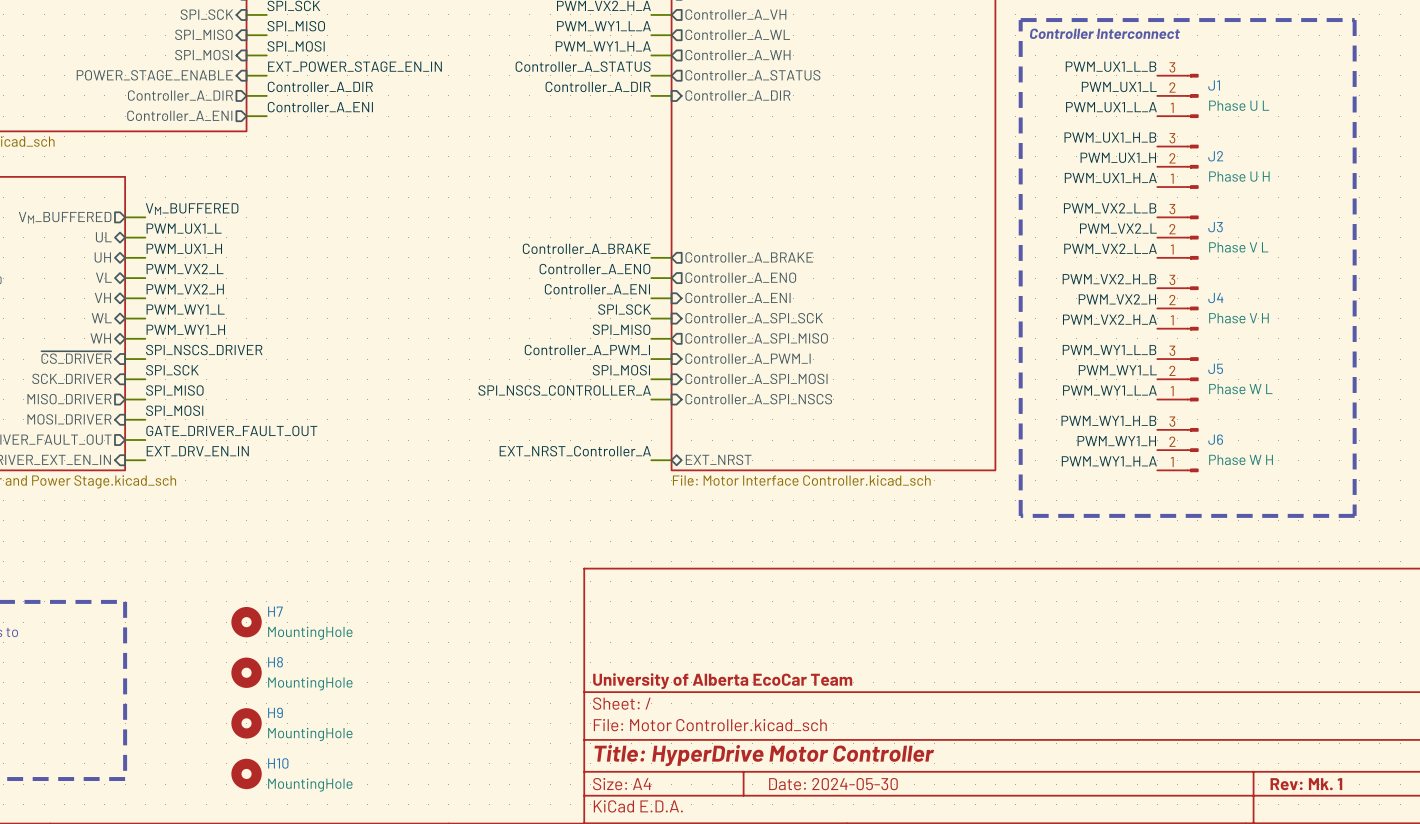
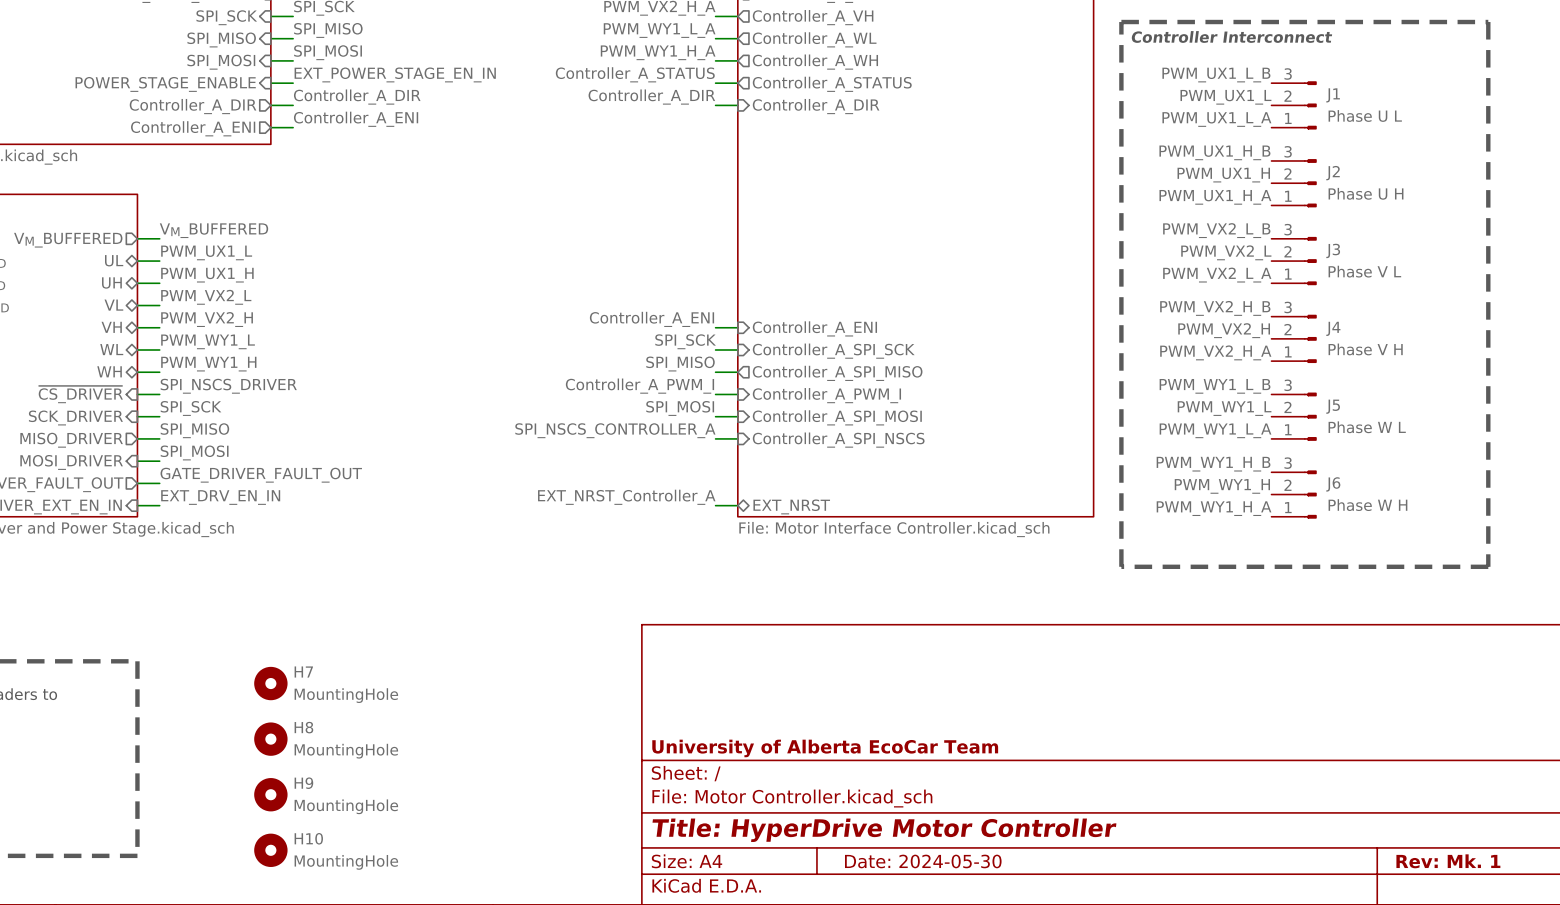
label: Controller_A_BRAKE (586, 248) -> none
wire: (651, 257) (671, 257) -> none
sheet pin: Controller_A_BRAKE (749, 257) -> none
label: Controller_A_ENO (594, 269) -> none
sheet pin: Controller_A_ENO (740, 277) -> none
wire: (651, 278) (671, 278) -> none

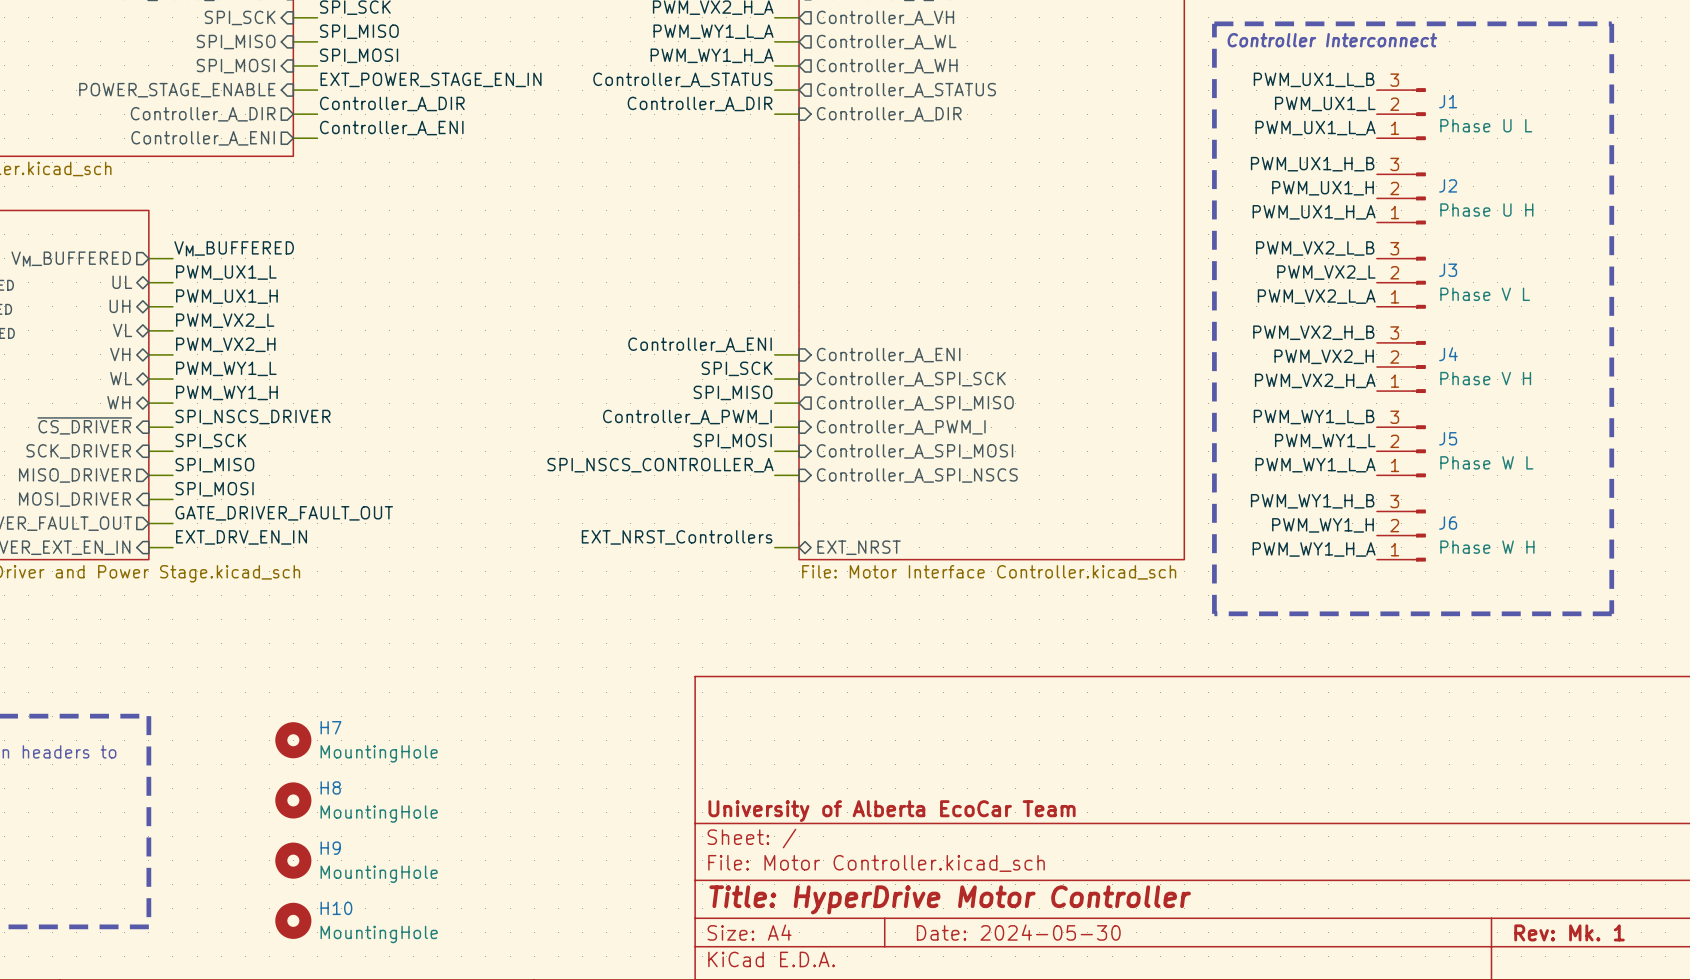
label: EXT_NRST_Controller_A (626, 497) -> EXT_NRST_Controllers (677, 537)

